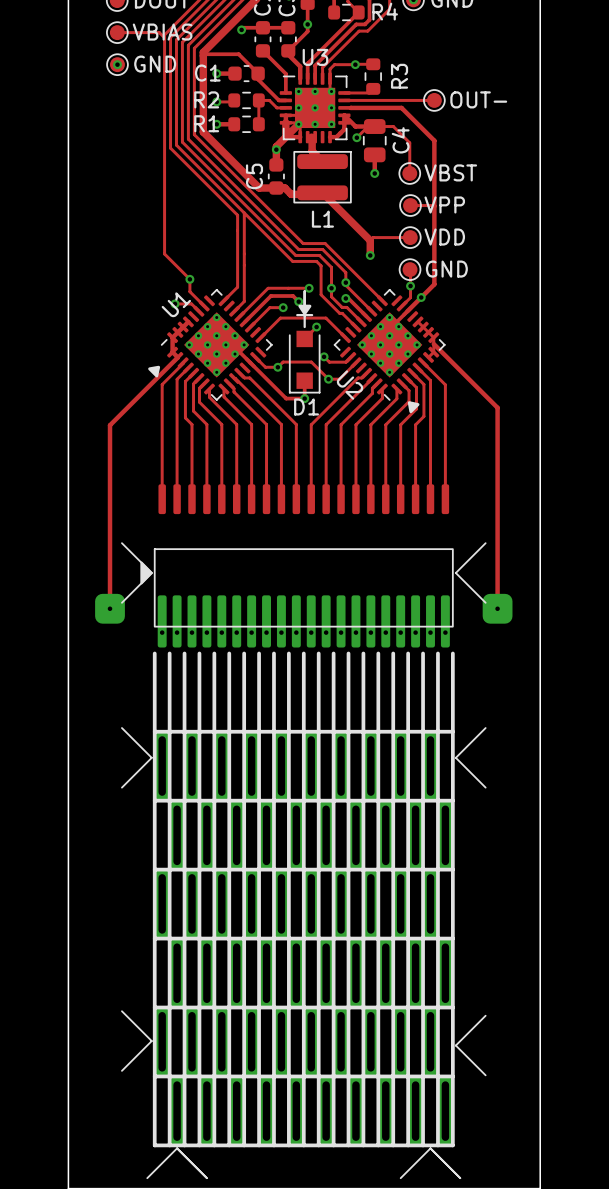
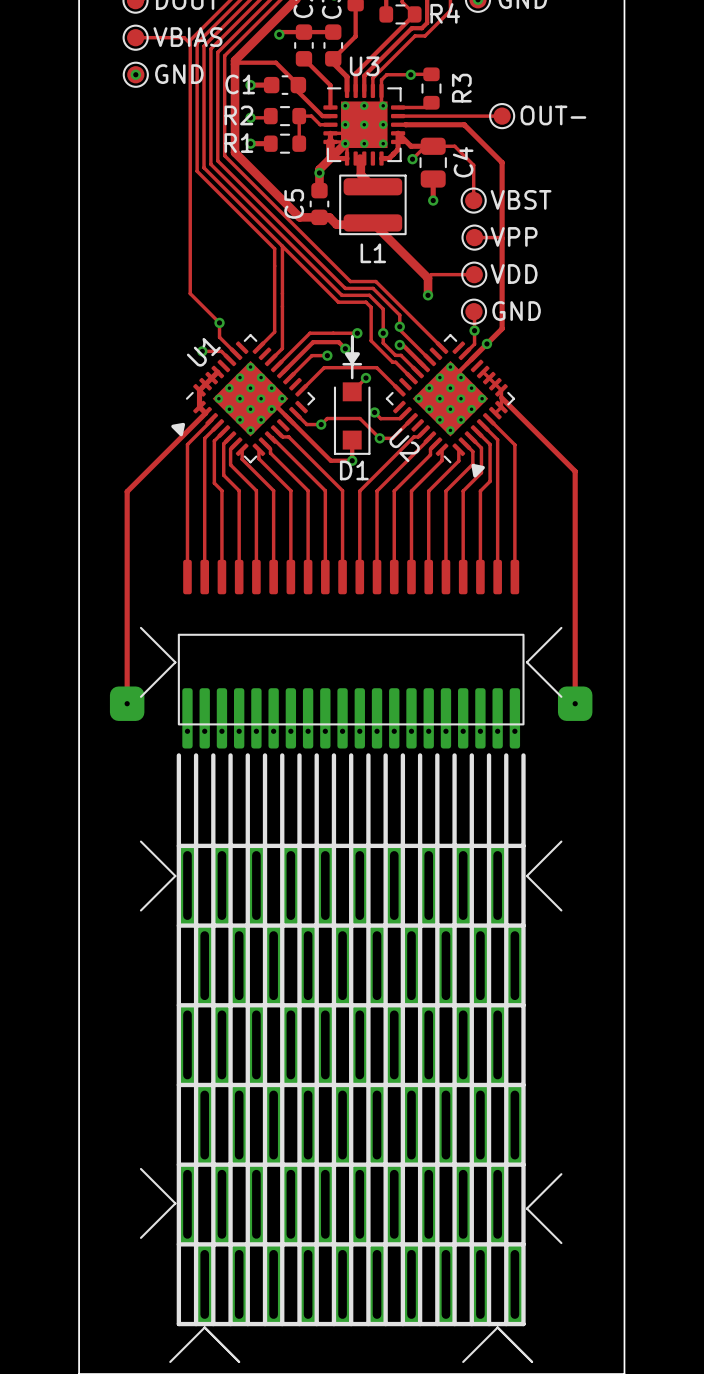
via: (307, 24) -> none
drawing: [140, 561, 153, 585] -> none

